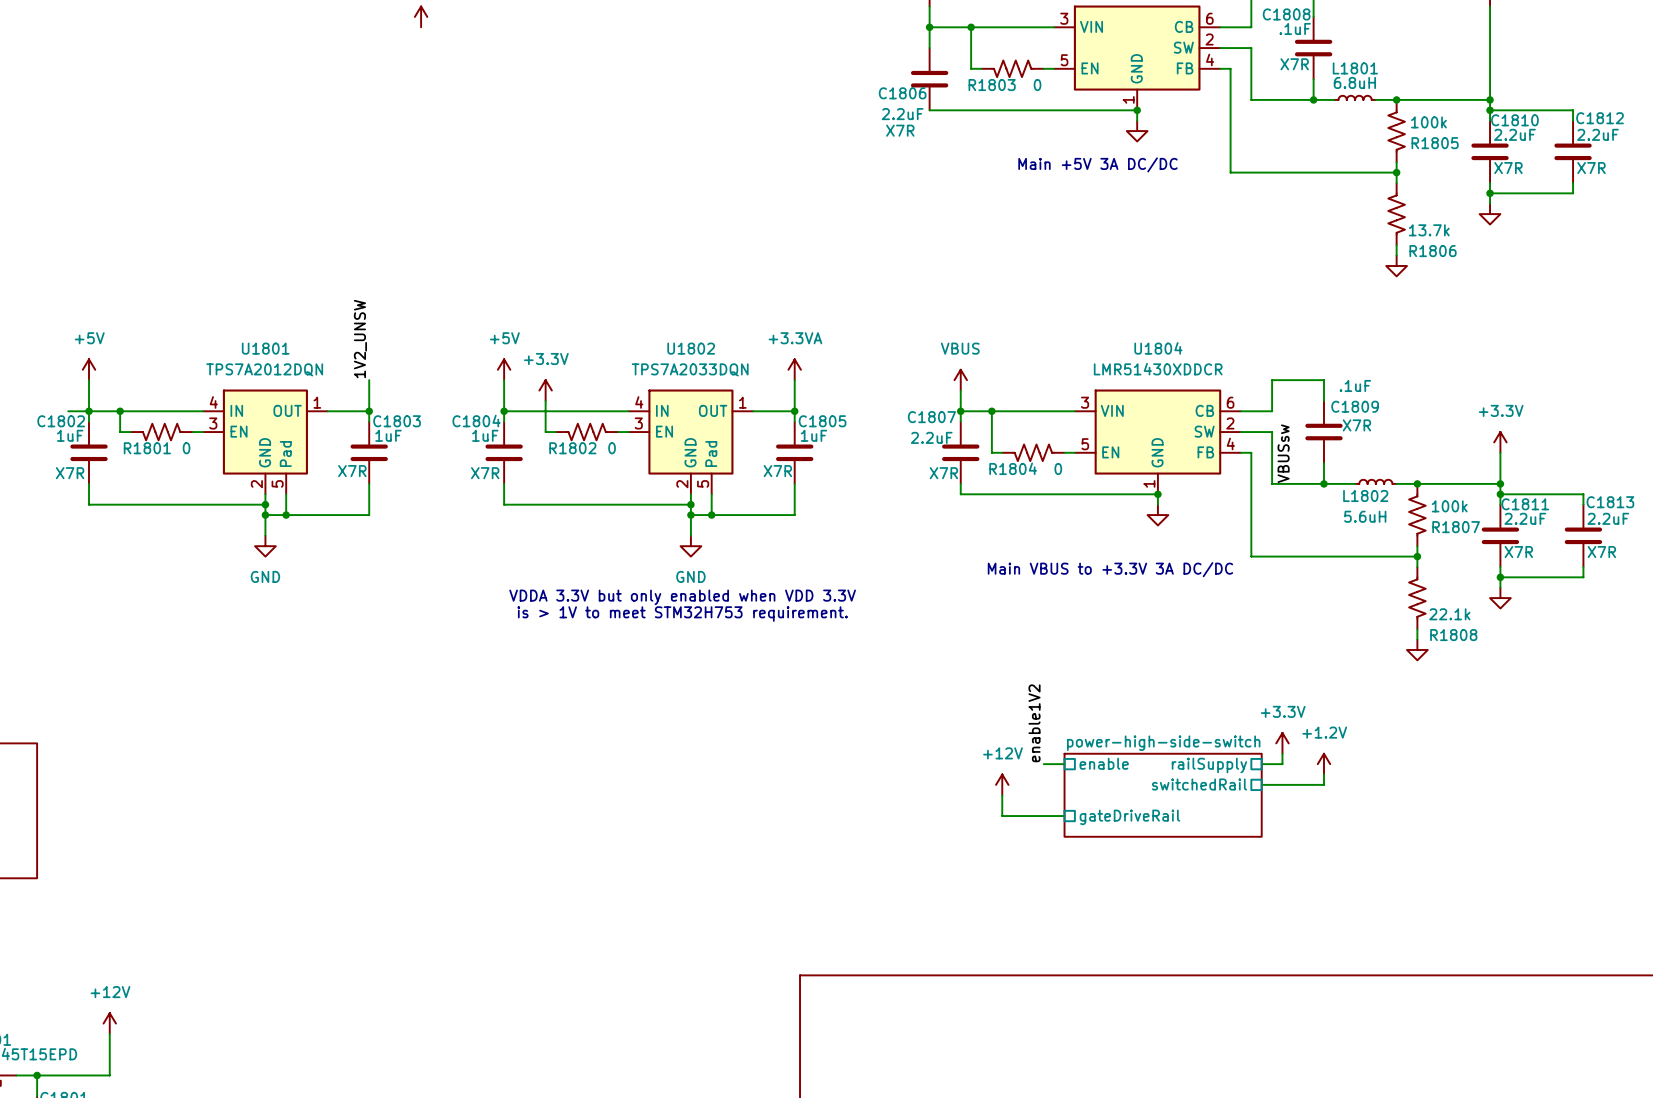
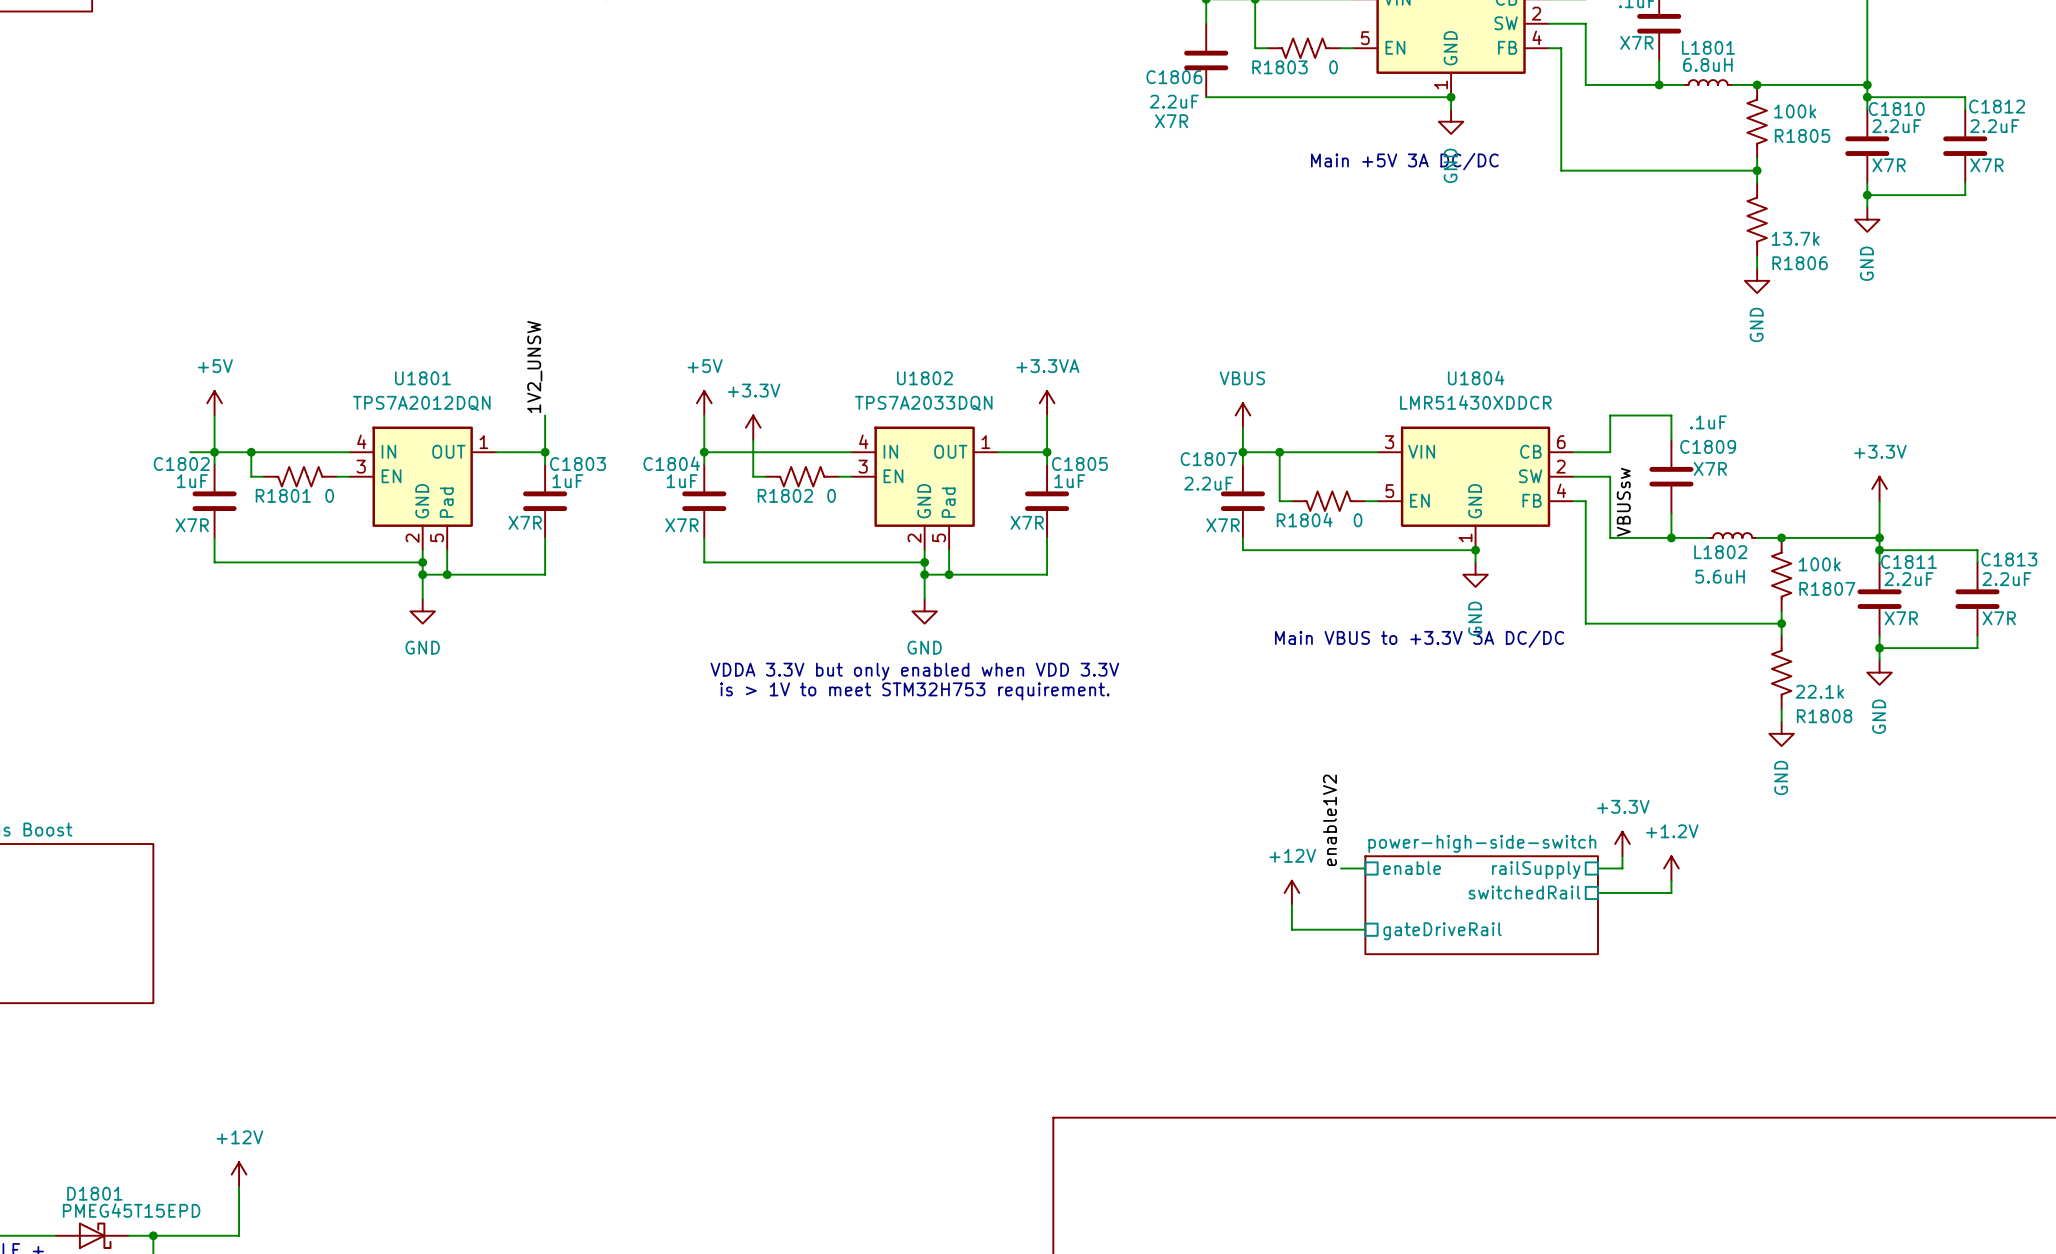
power symbol text: none -> GND (1450, 165)
power symbol text: none -> GND (1866, 263)
power symbol text: none -> GND (1756, 324)
power symbol text: none -> GND (1475, 618)
power symbol text: none -> GND (1879, 716)
power symbol text: none -> GND (1781, 777)

